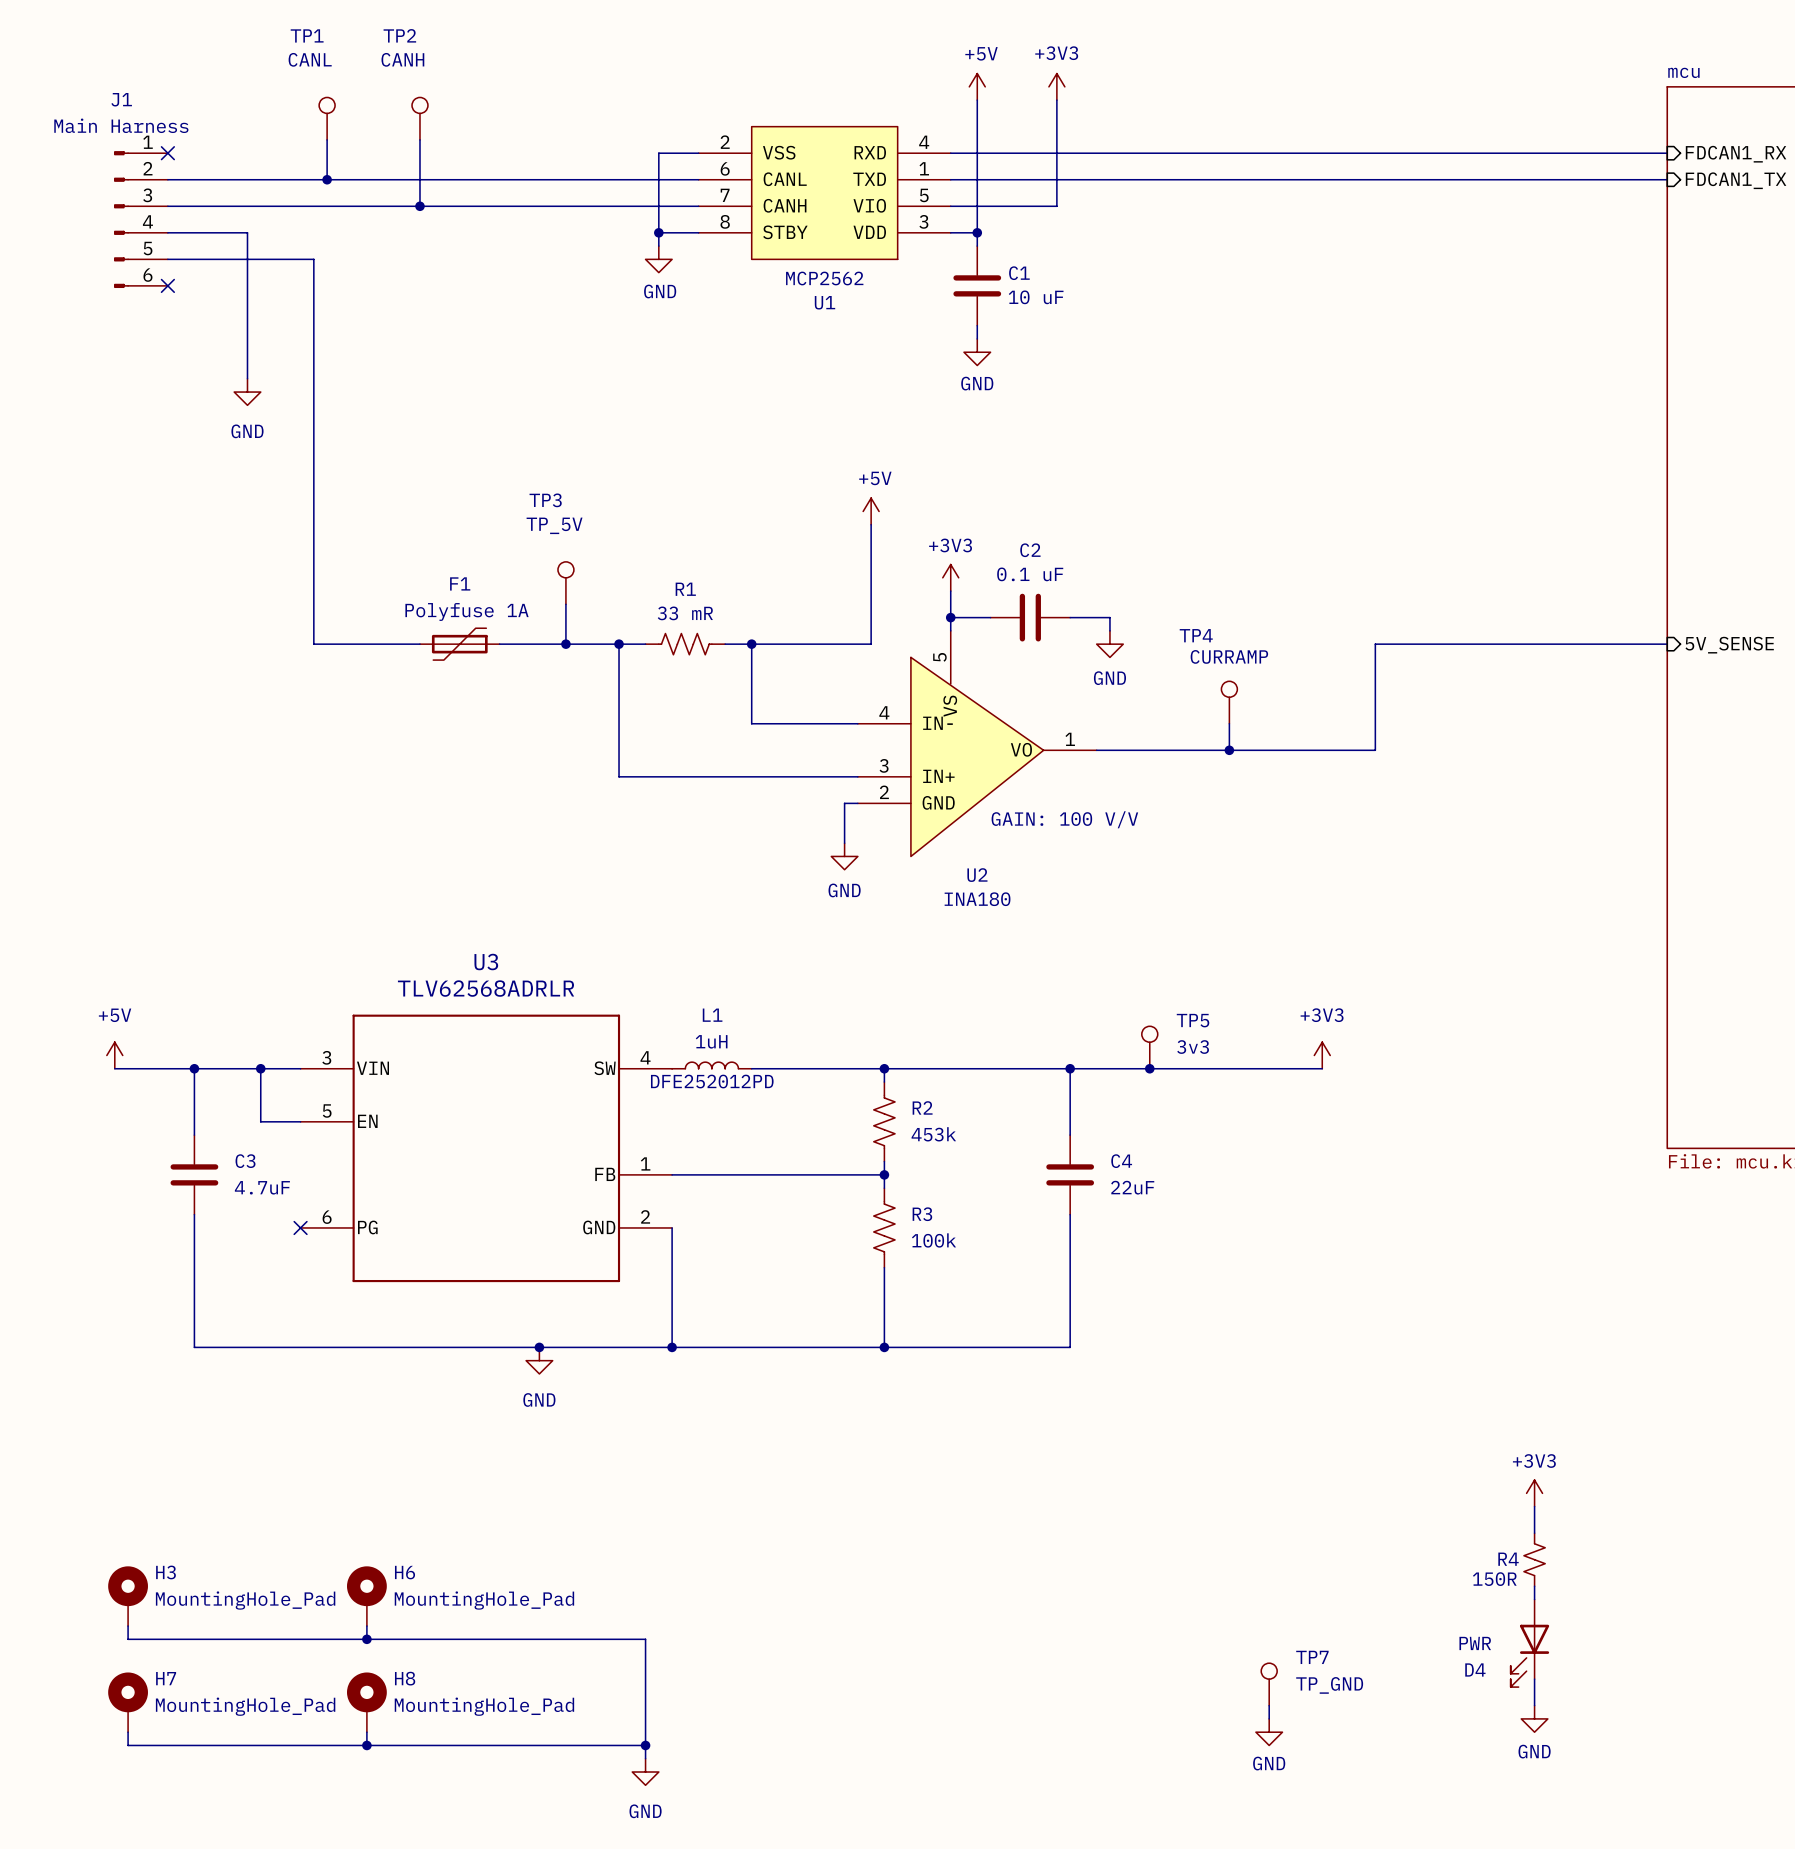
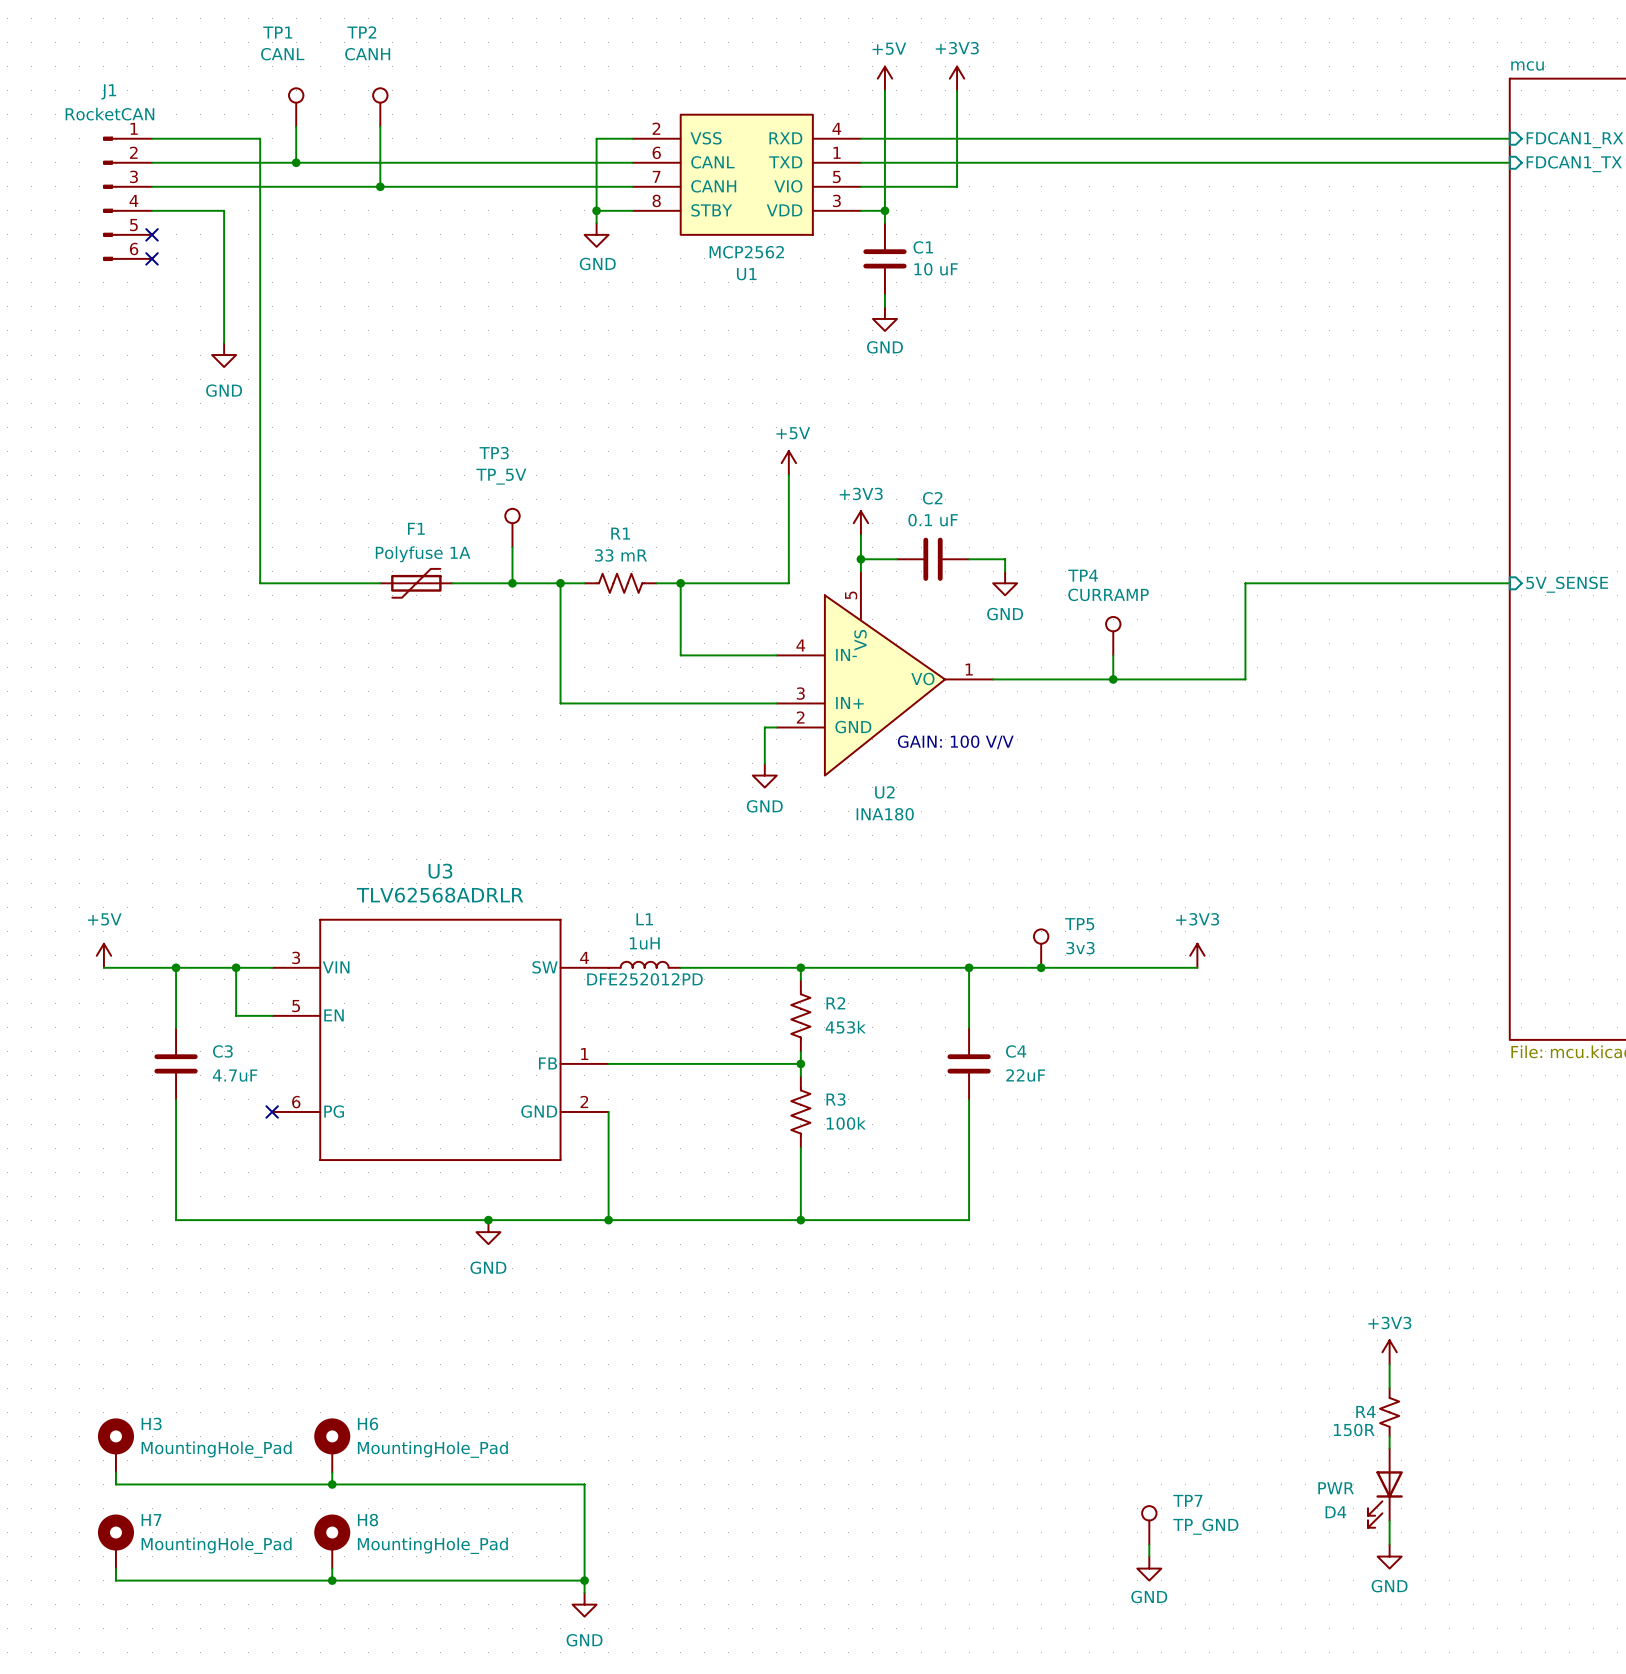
J1 value: Main Harness (121, 125) -> RocketCAN (109, 114)
no-connect mark: (167, 153) -> none
wire: (167, 259) (313, 259) (313, 644) -> (152, 138) (260, 138) (260, 583) (284, 583)
no-connect mark: none -> (152, 234)

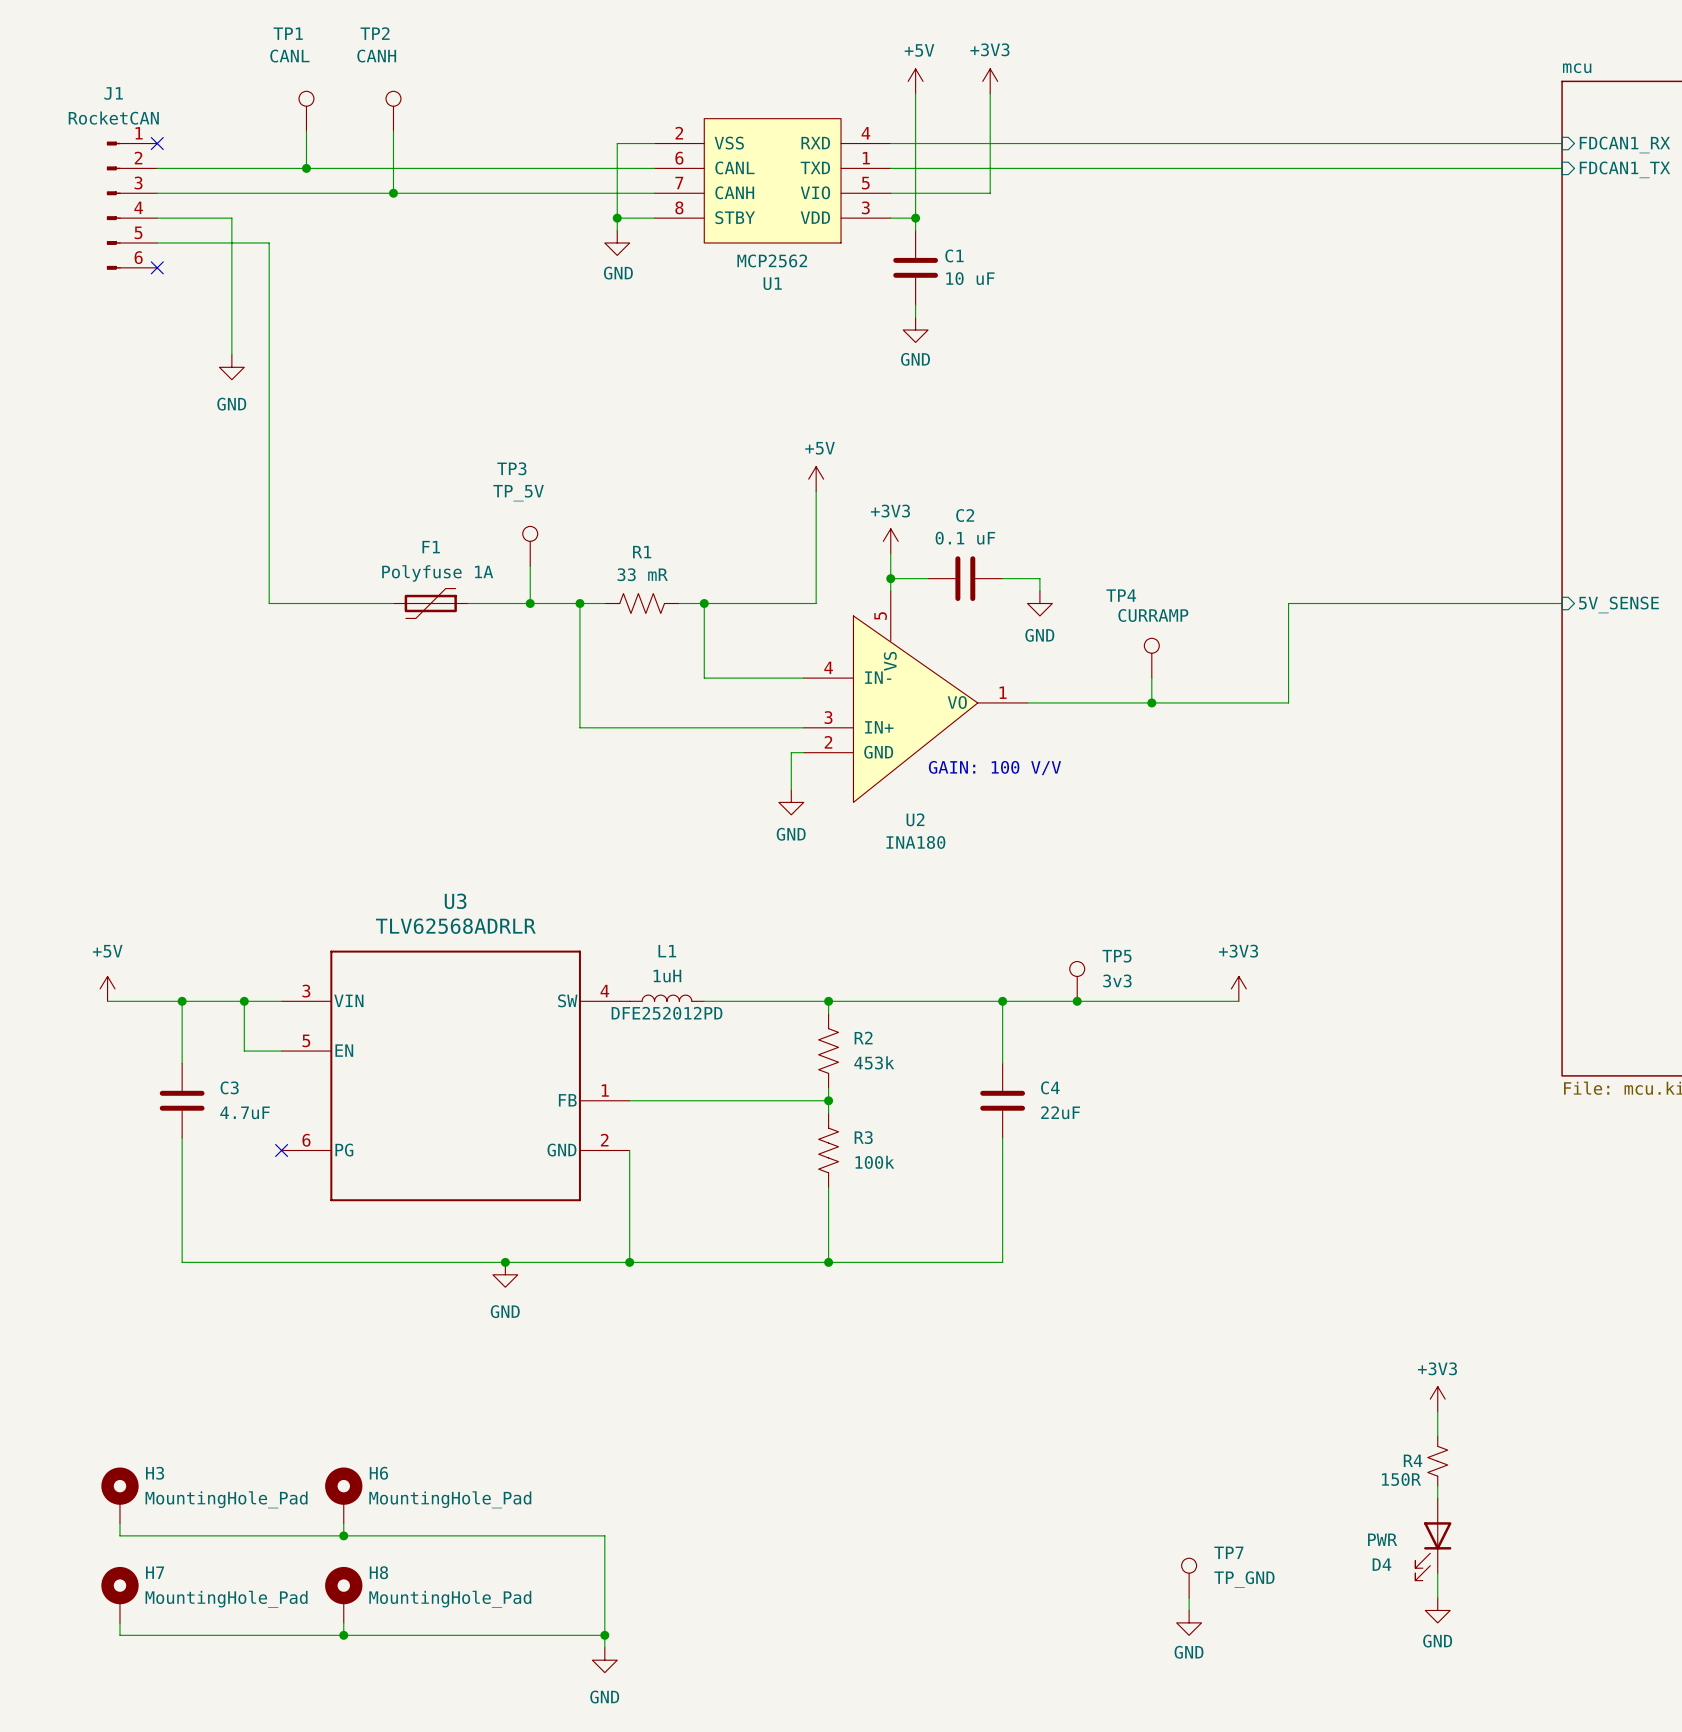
wire: (152, 138) (260, 138) (260, 234) -> (157, 242) (269, 242)
no-connect mark: none -> (157, 143)
no-connect mark: (152, 234) -> none

